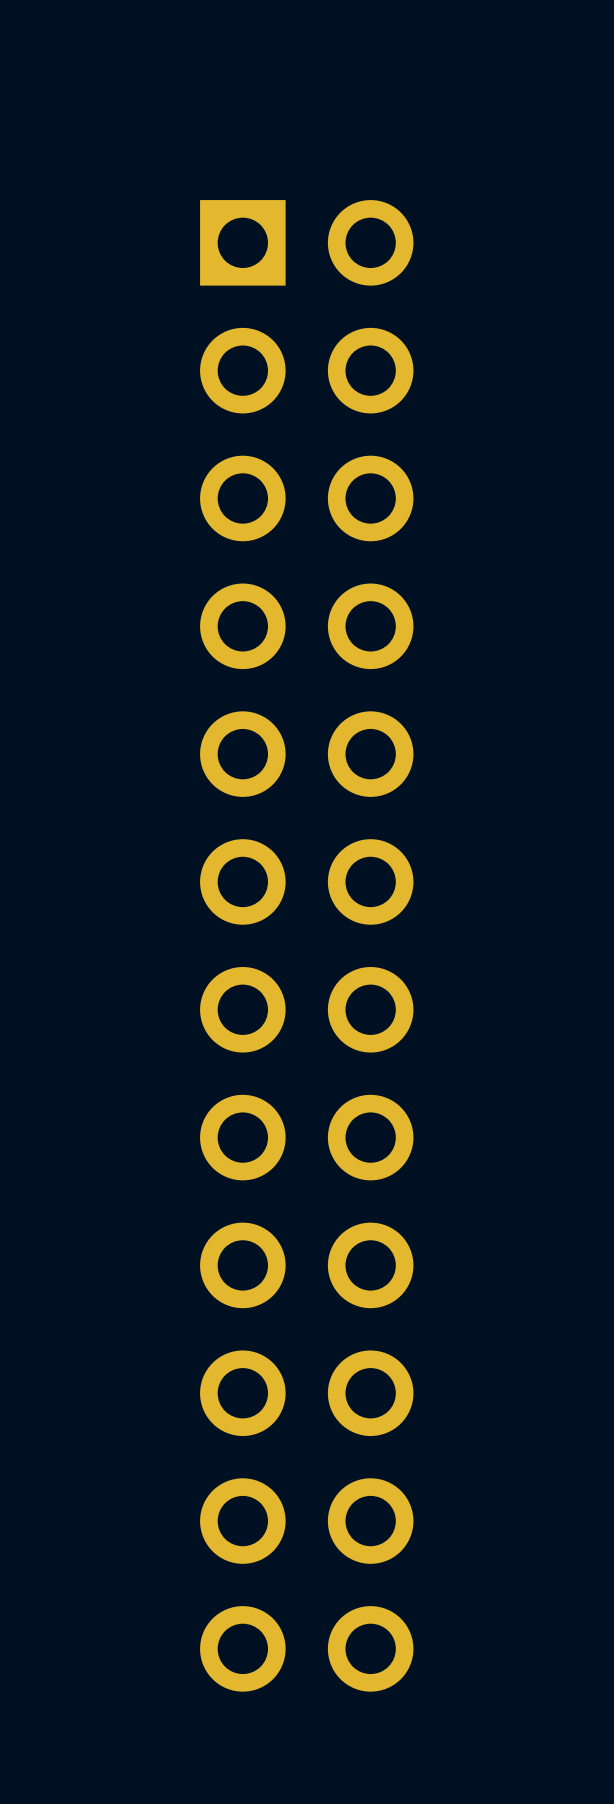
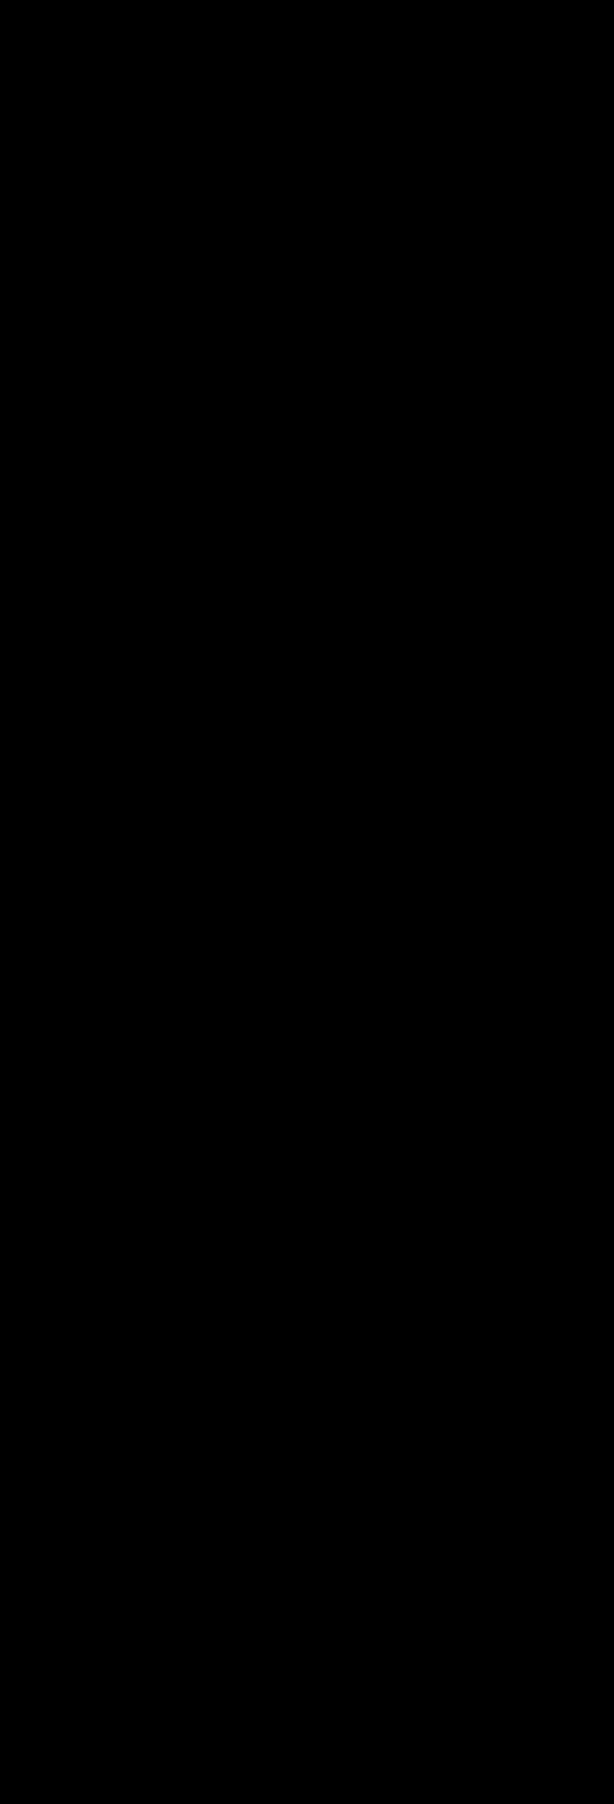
part: (306, 945) -> none

